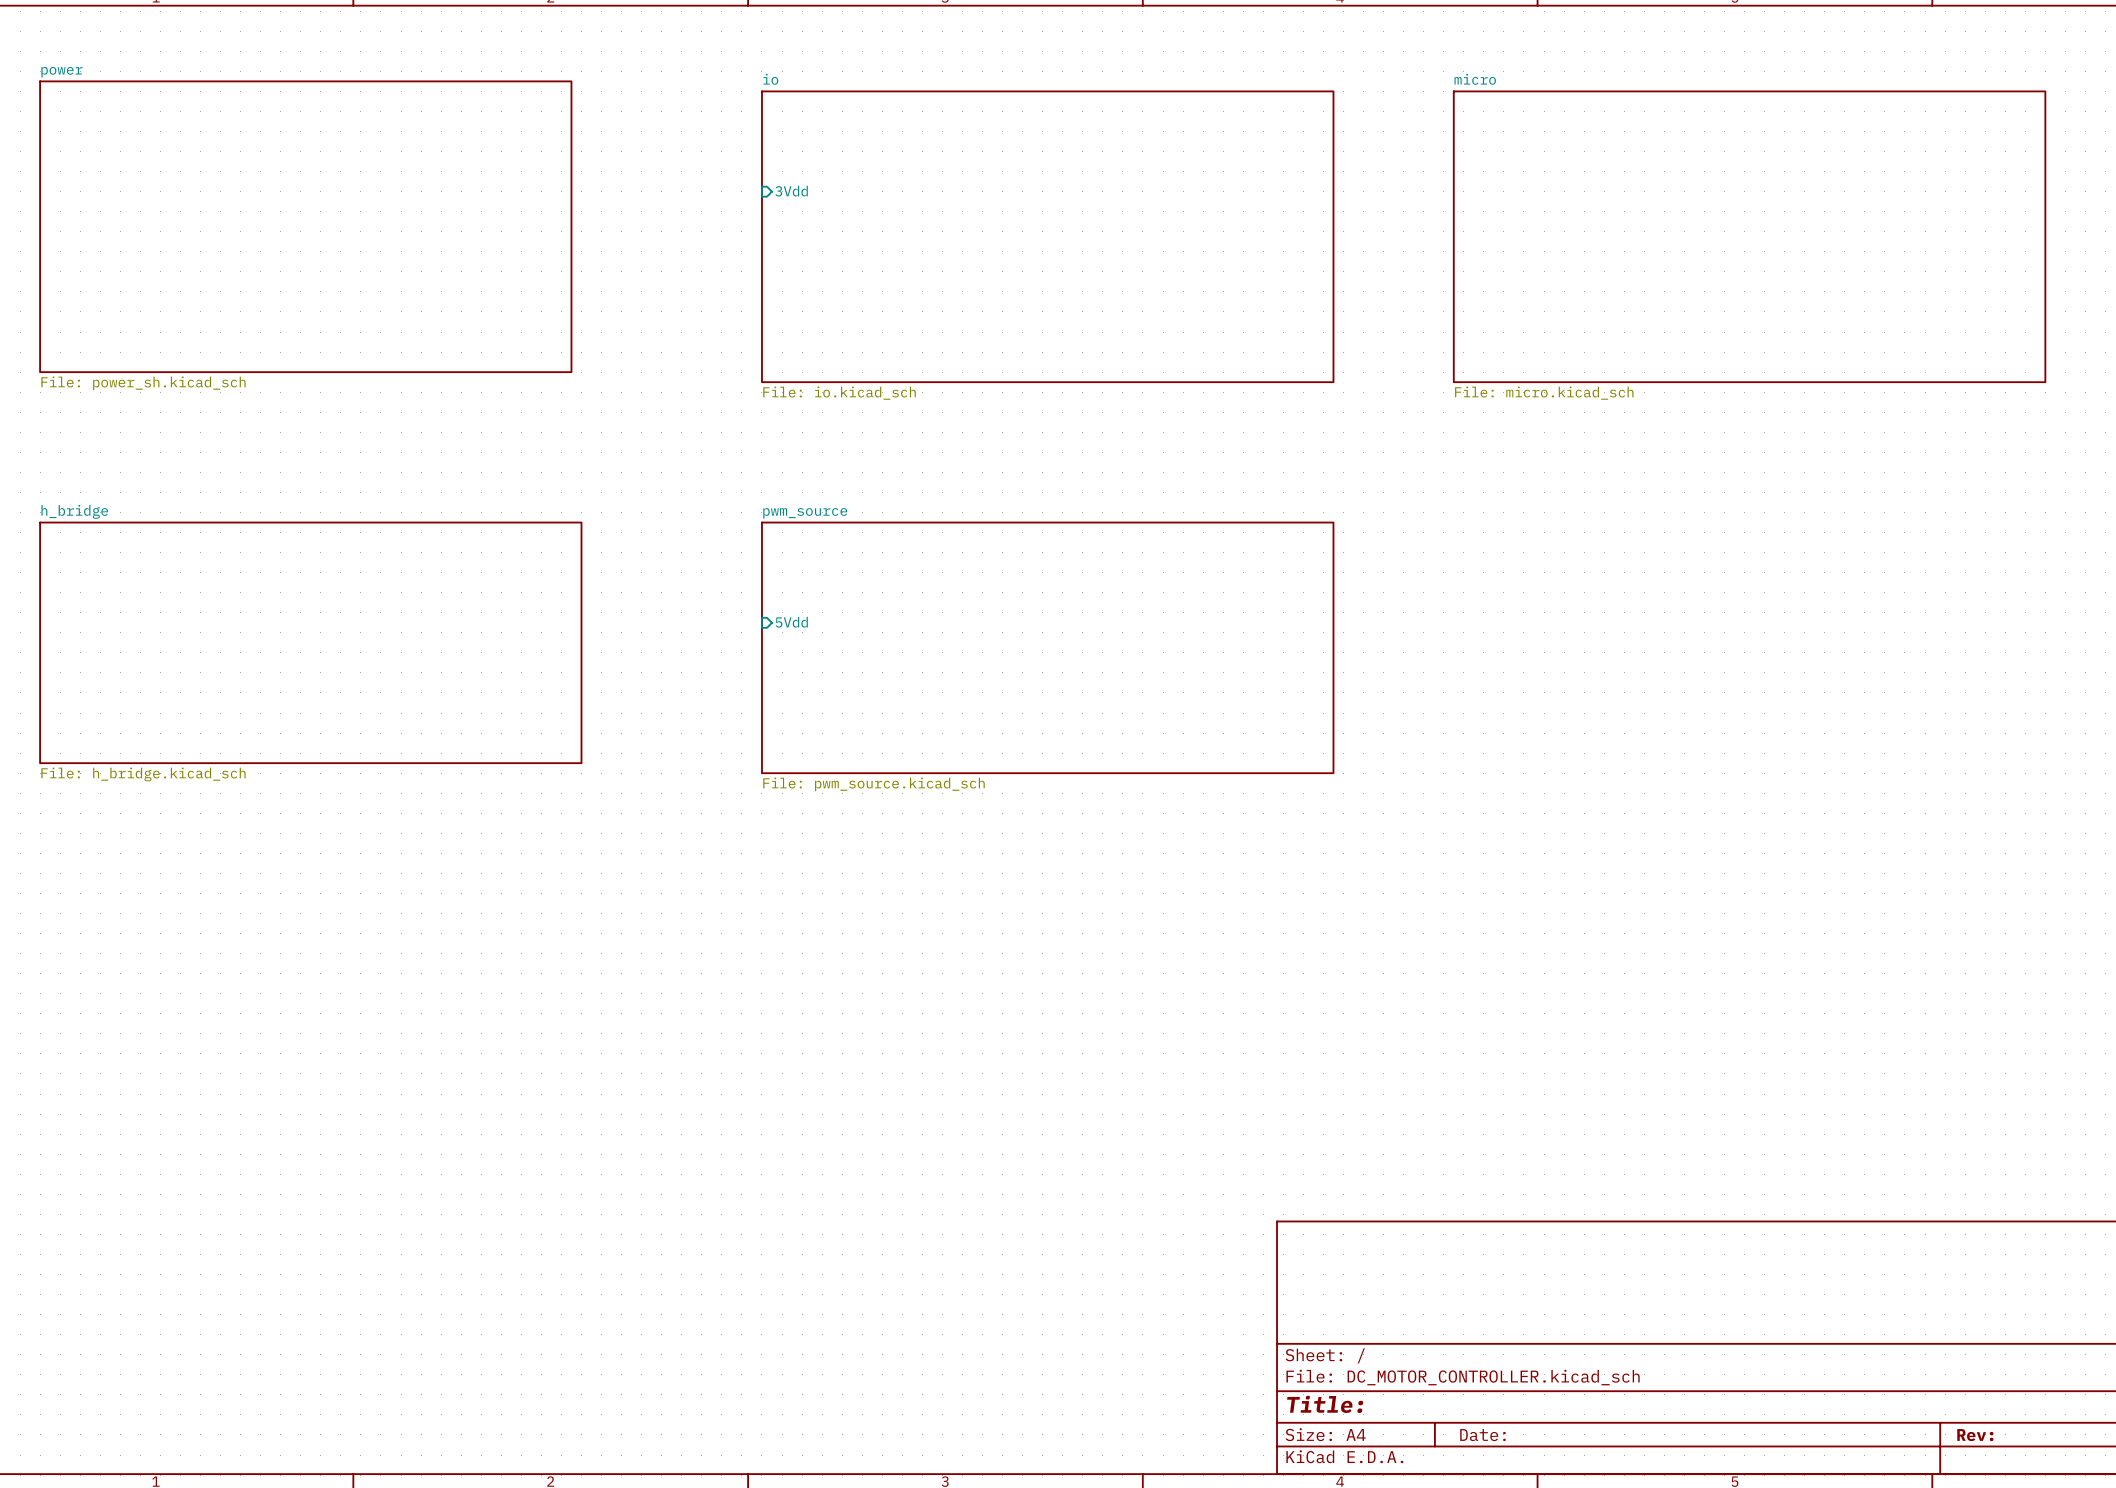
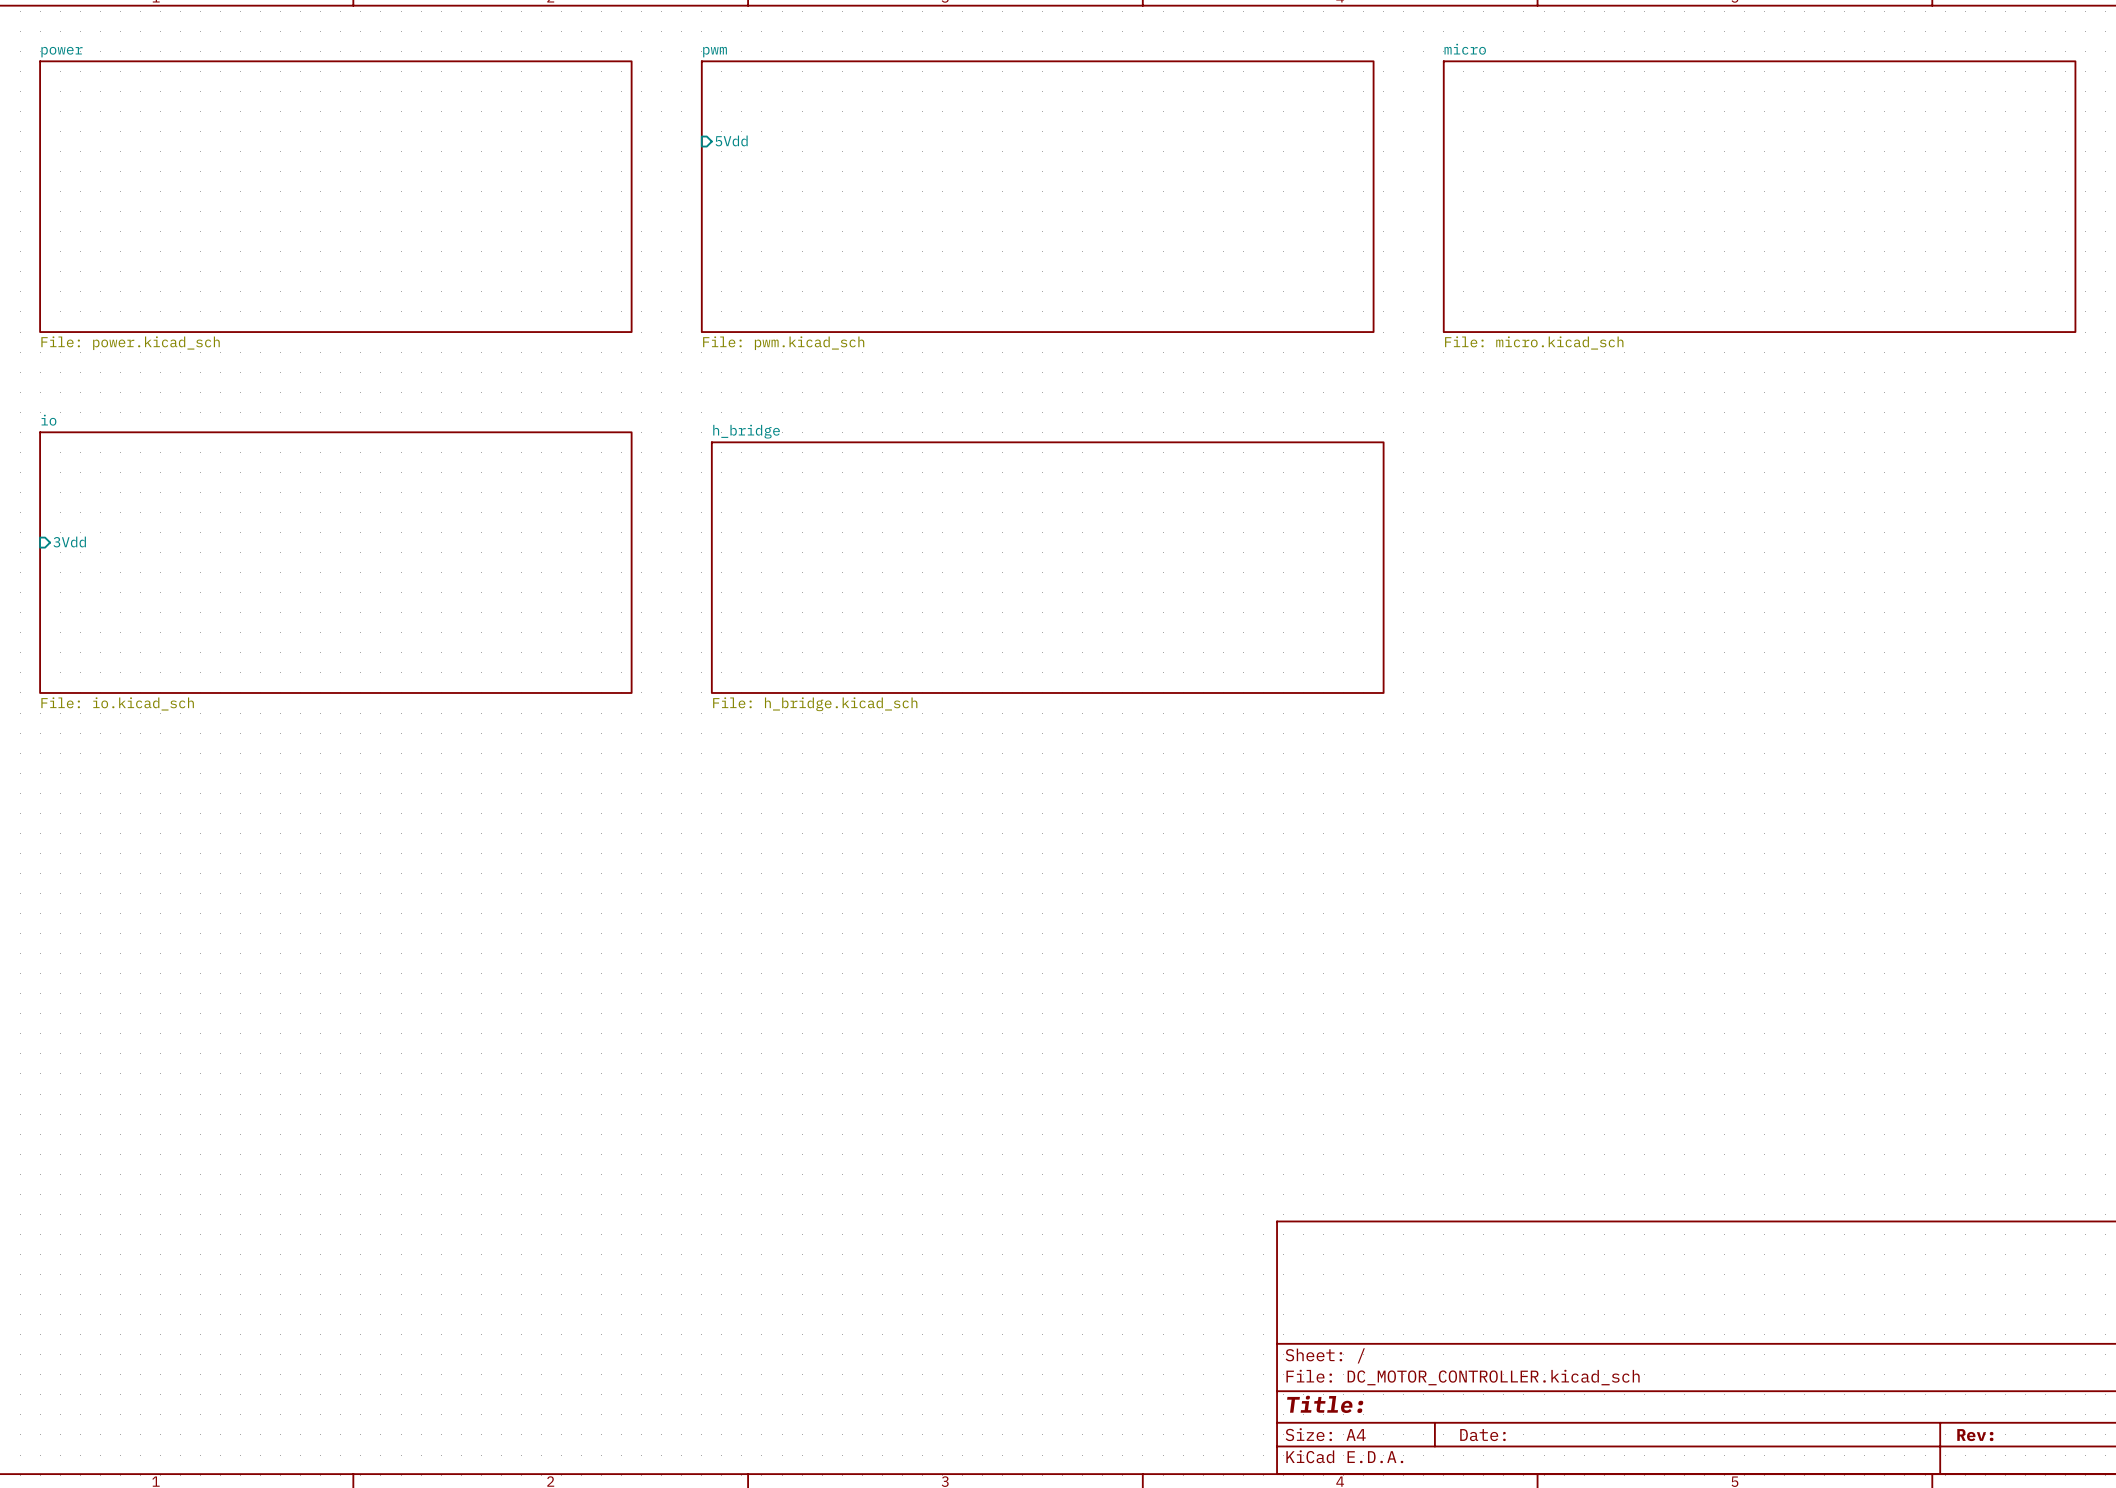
sheet pin: none -> 5Vdd (731, 140)
sheet pin: 3Vdd (791, 191) -> none
sheet power: none -> File: power.kicad_sch (335, 196)
sheet pwm: none -> File: pwm.kicad_sch (1037, 196)
sheet micro: none -> File: micro.kicad_sch (1759, 196)
sheet power: File: power_sh.kicad_sch (305, 226) -> none
sheet io: File: io.kicad_sch (1047, 236) -> none
sheet micro: File: micro.kicad_sch (1749, 236) -> none
sheet pin: none -> 3Vdd (69, 542)
sheet io: none -> File: io.kicad_sch (335, 562)
sheet h_bridge: none -> File: h_bridge.kicad_sch (1047, 567)
sheet pin: 5Vdd (791, 622) -> none
sheet h_bridge: File: h_bridge.kicad_sch (310, 642) -> none
sheet pwm_source: File: pwm_source.kicad_sch (1047, 647) -> none

